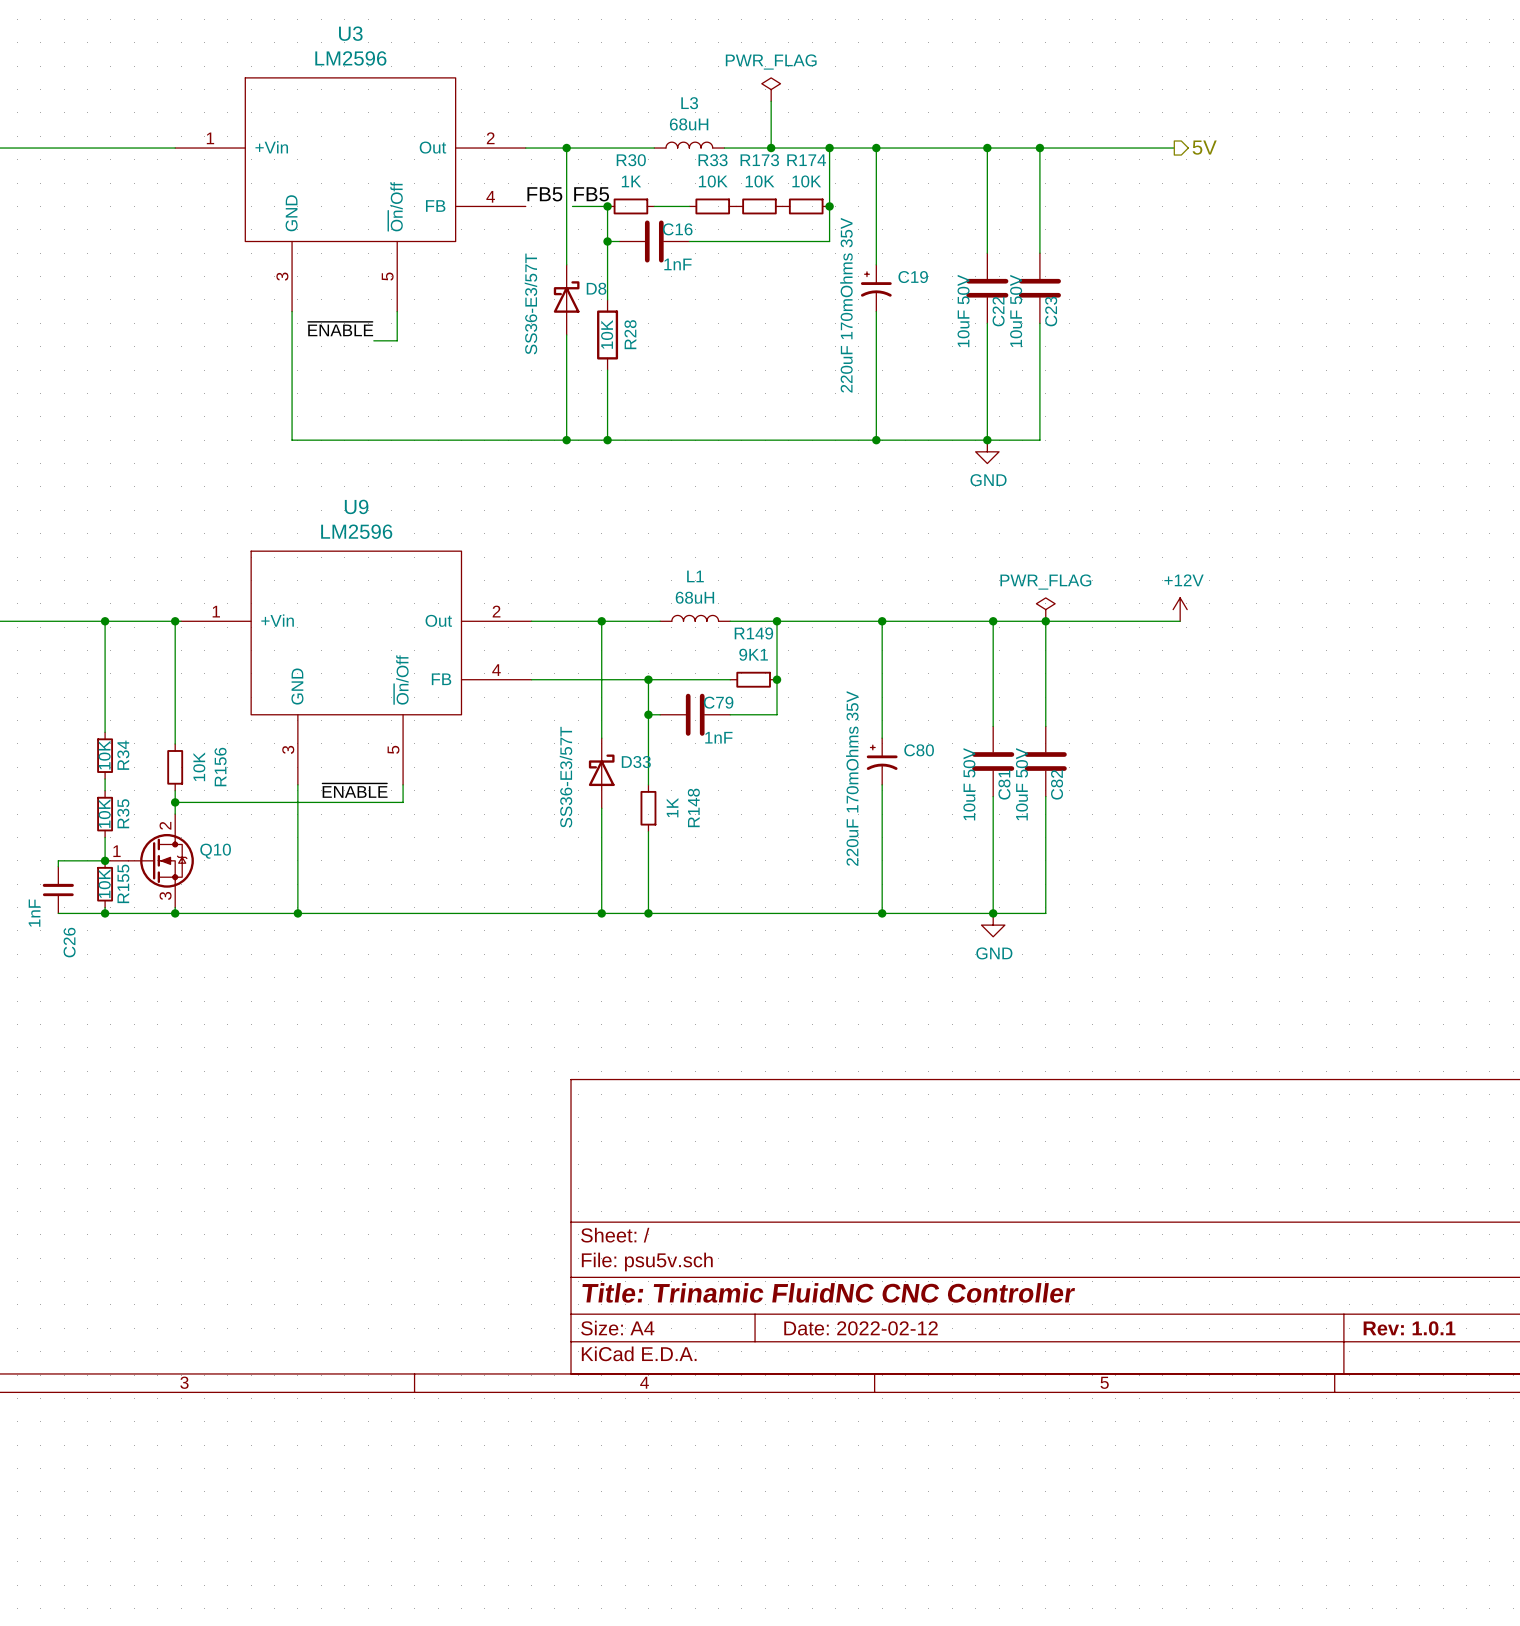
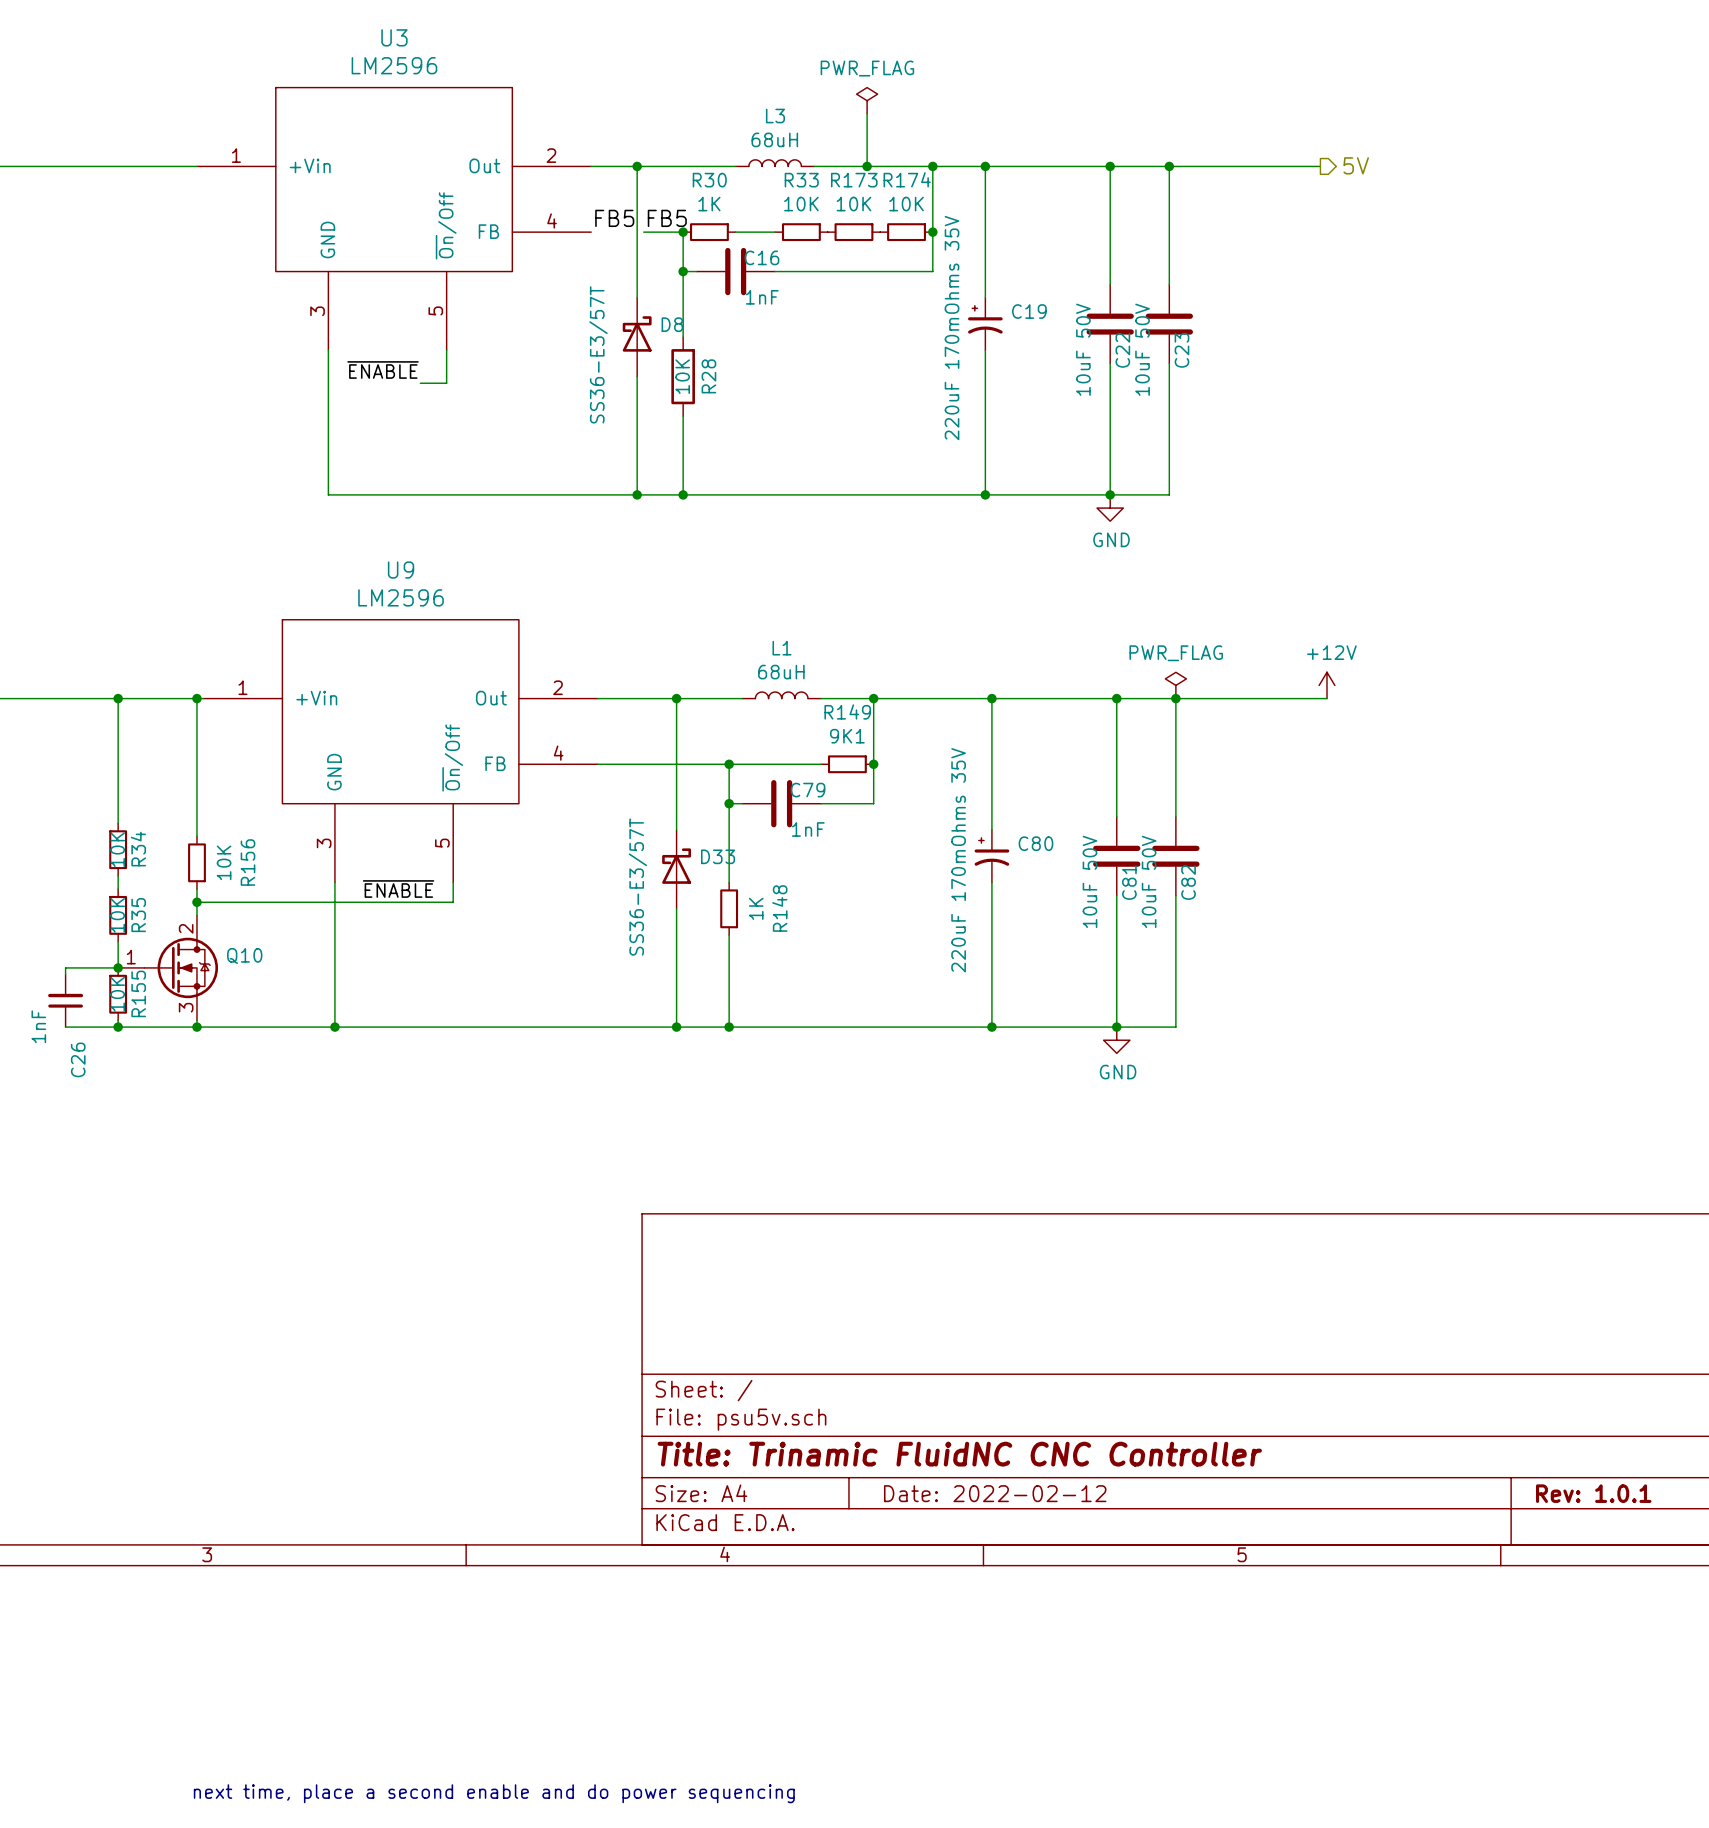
text: none -> next time, place a second enable and do power sequencing (494, 1793)

